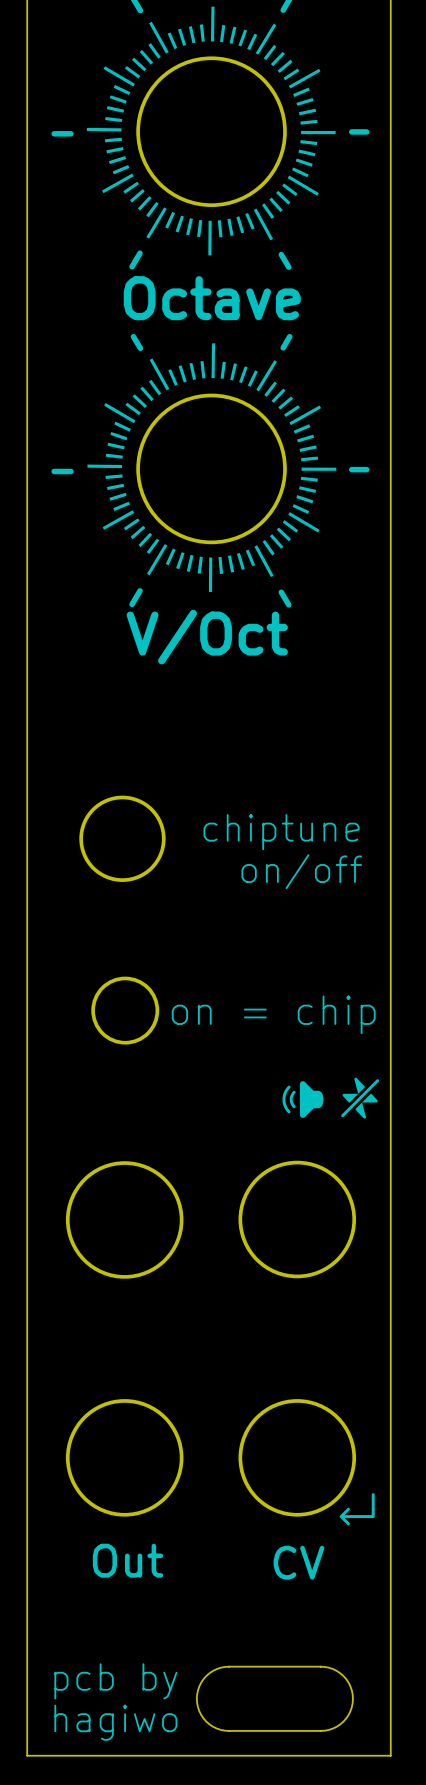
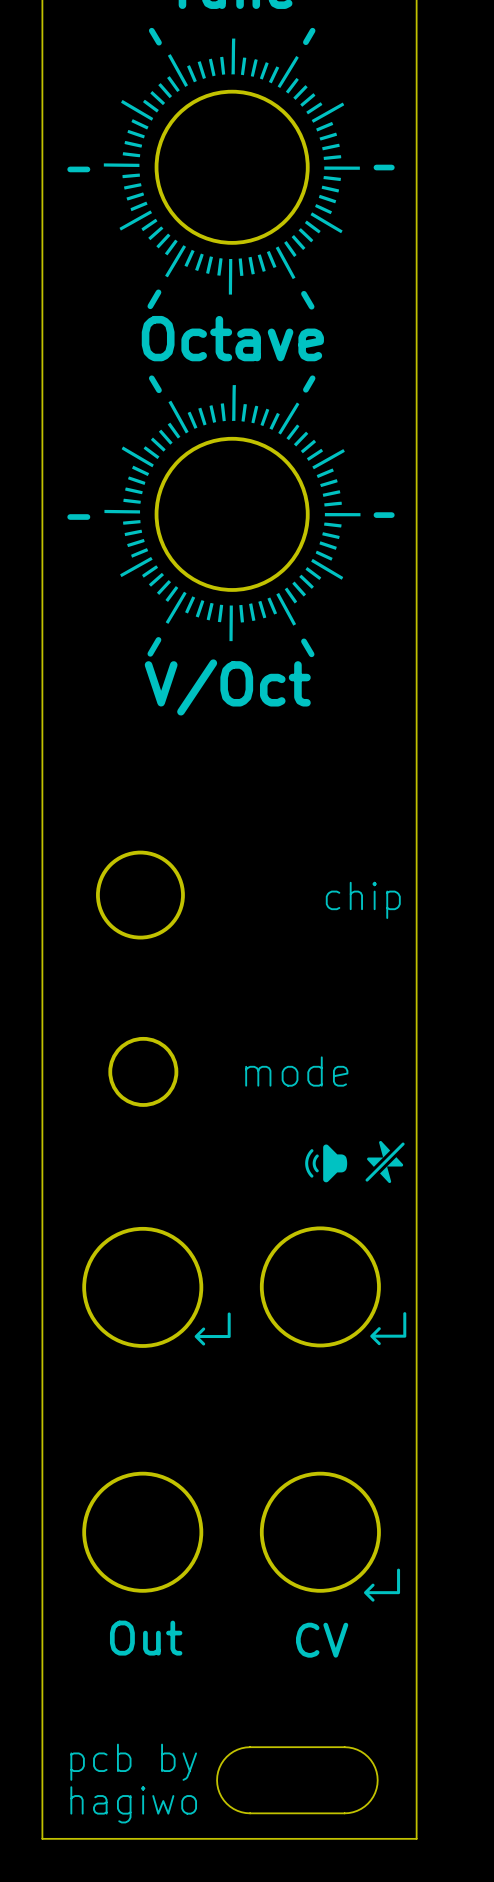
text: chiptune (281, 832) -> chip (363, 900)
text: on/off (301, 871) -> none
text: on = chip (273, 1014) -> mode (296, 1071)
drawing: none -> [194, 1312, 231, 1346]
drawing: none -> [370, 1312, 407, 1346]

